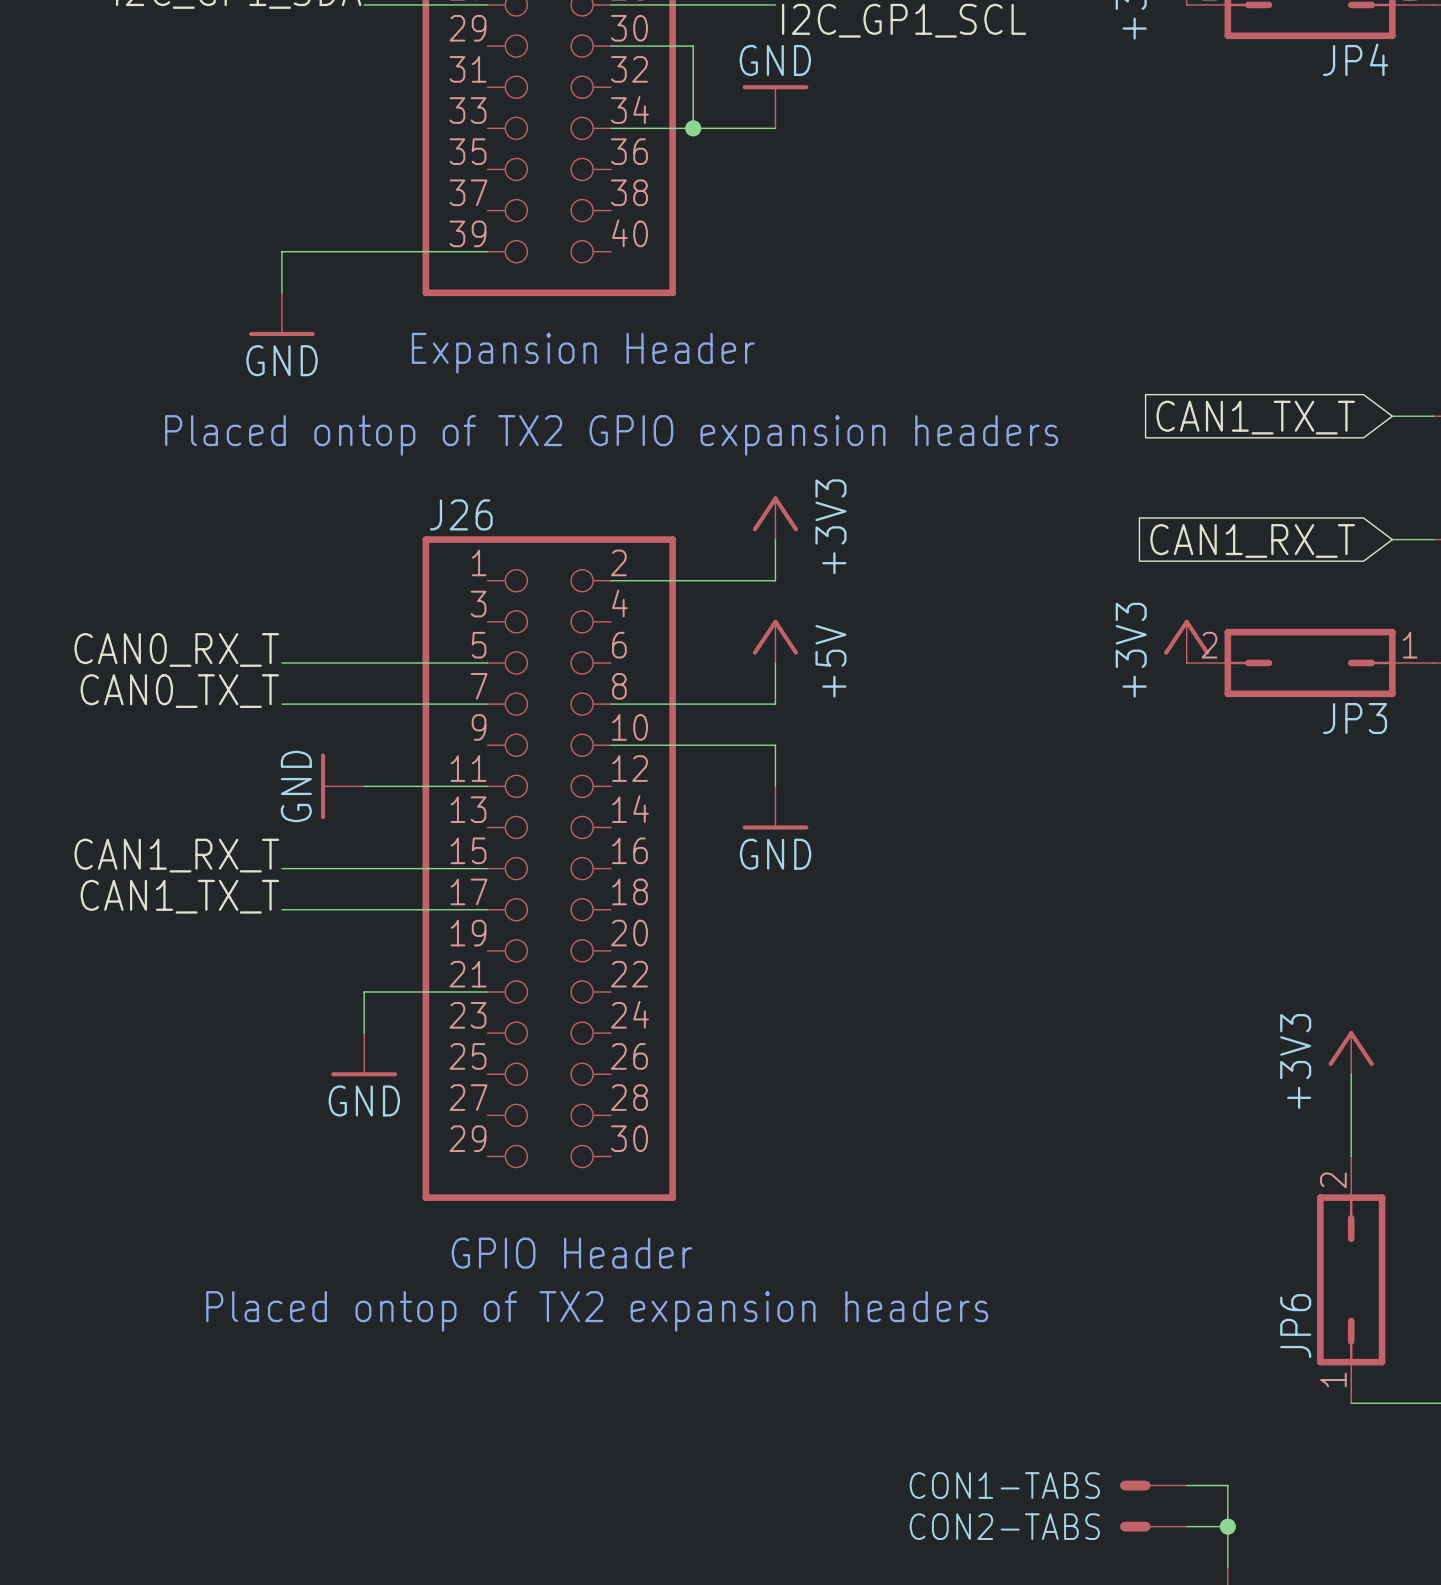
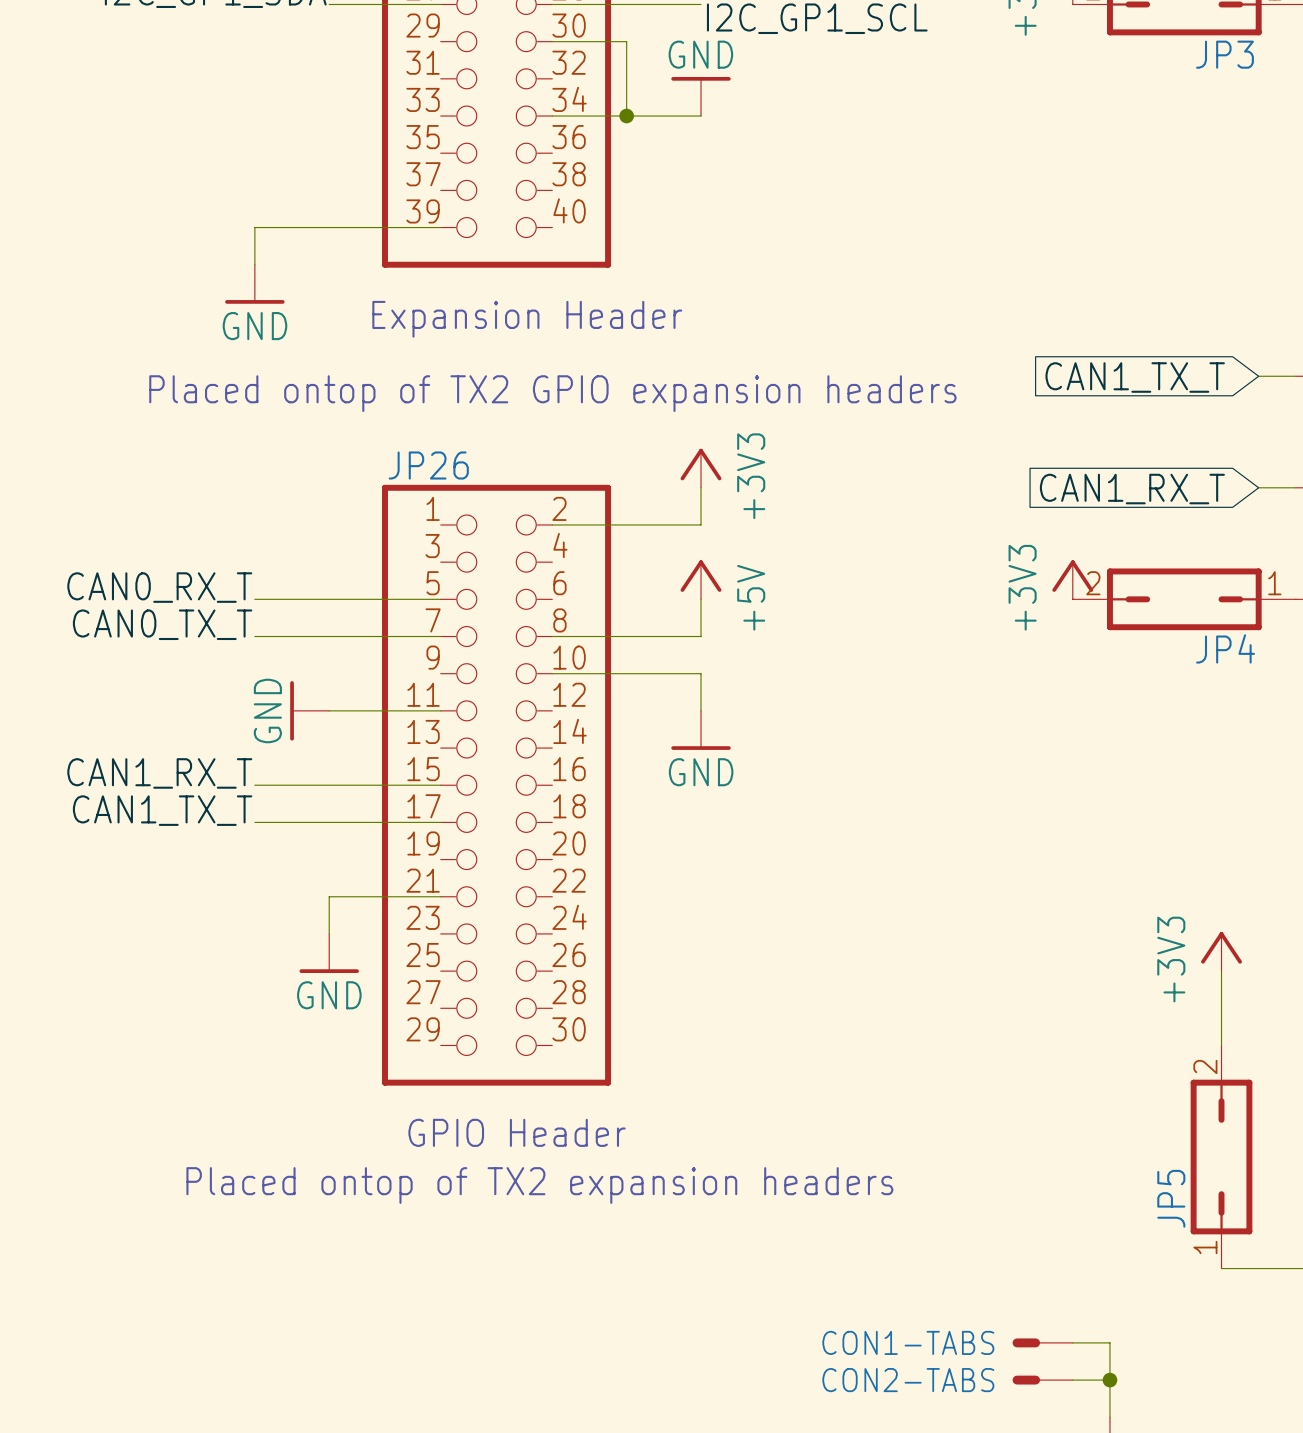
JP4 name: JP4 (1355, 59) -> JP3 (1224, 54)
J26 name: J26 (461, 514) -> JP26 (428, 465)
JP3 name: JP3 (1355, 718) -> JP4 (1225, 648)
JP6 name: JP6 (1295, 1326) -> JP5 (1171, 1198)

